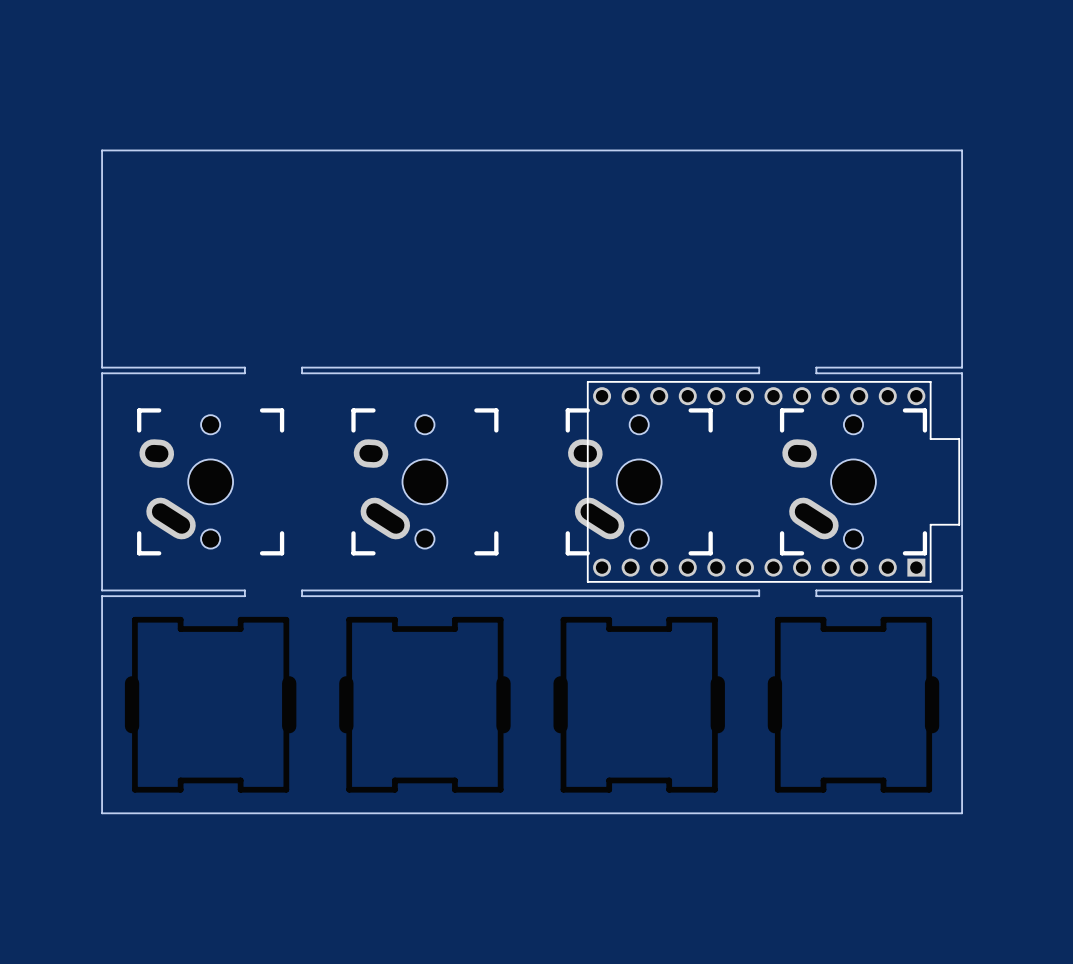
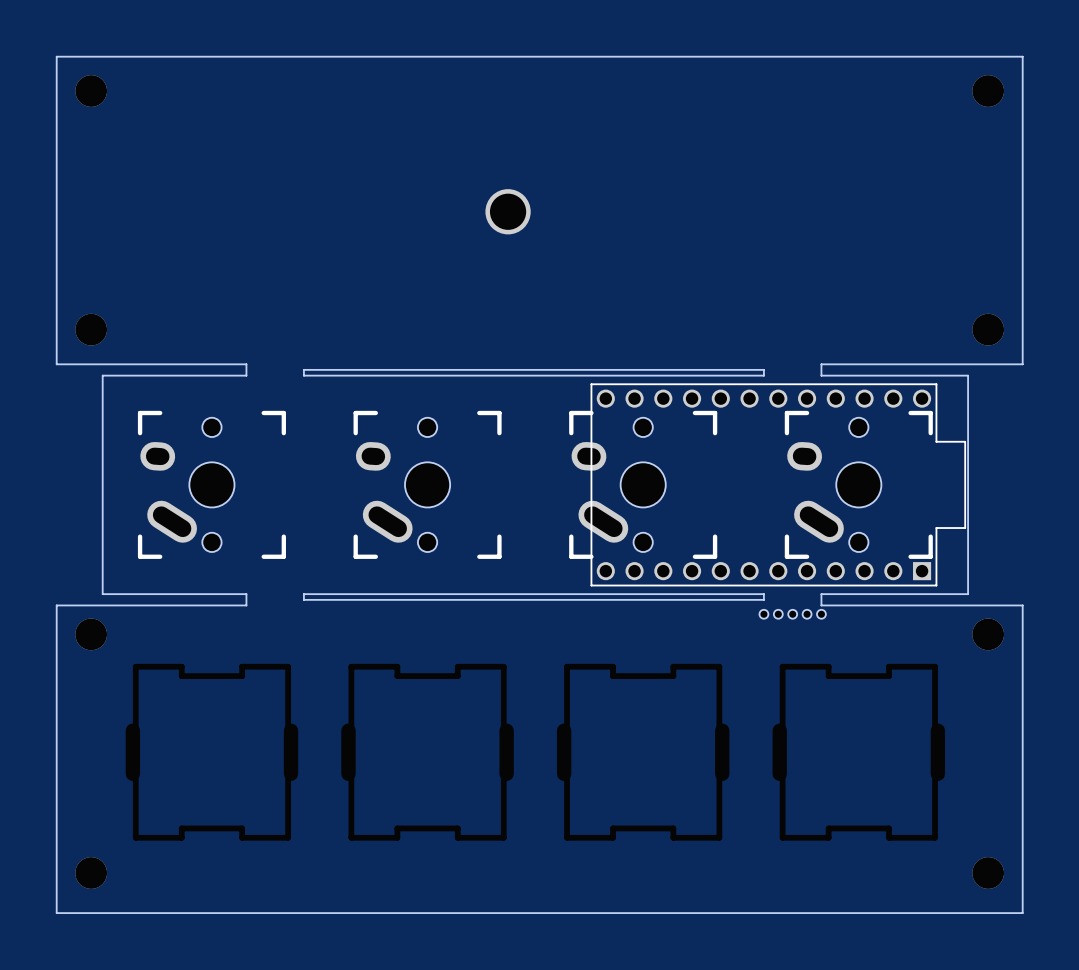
part: none -> (91, 91)
part: none -> (988, 91)
part: none -> (508, 211)
part: none -> (91, 329)
part: none -> (988, 329)
board edge: (816, 367) (962, 367) (962, 150) (102, 150) (102, 367) (244, 367) -> (821, 369) (821, 364) (1022, 364) (1022, 56) (56, 56) (56, 364) (246, 364) (246, 369)
board edge: (816, 596) (962, 596) (962, 813) (102, 813) (102, 596) (244, 596) -> (821, 599) (821, 605) (1022, 605) (1022, 913) (56, 913) (56, 605) (246, 605) (246, 599)
part: none -> (792, 614)
part: none -> (91, 634)
part: none -> (988, 634)
part position: (210, 704) -> (211, 752)
part position: (424, 704) -> (427, 752)
part position: (639, 704) -> (643, 752)
part position: (853, 704) -> (858, 752)
part: none -> (91, 873)
part: none -> (988, 873)

